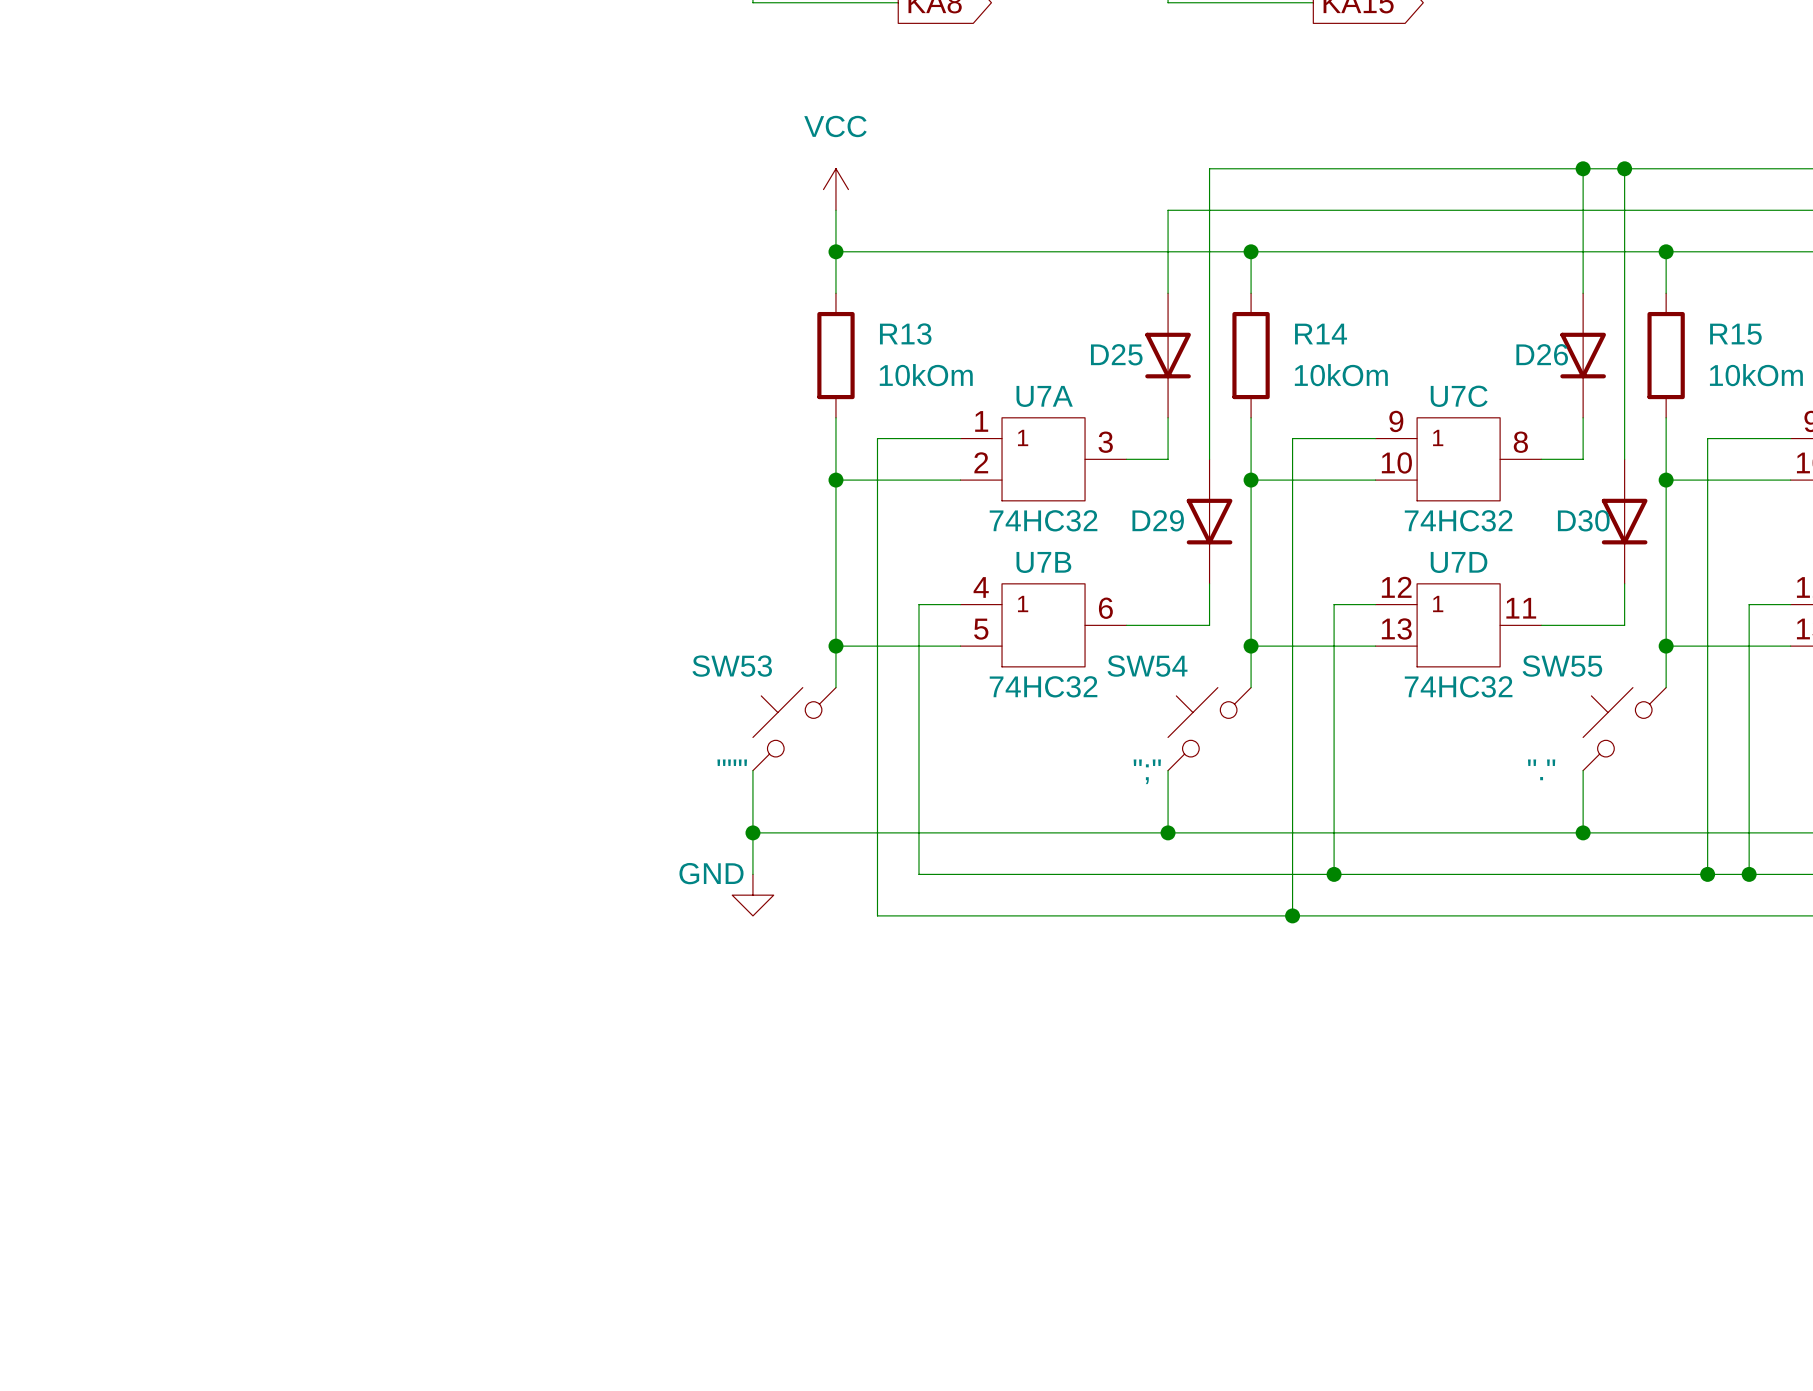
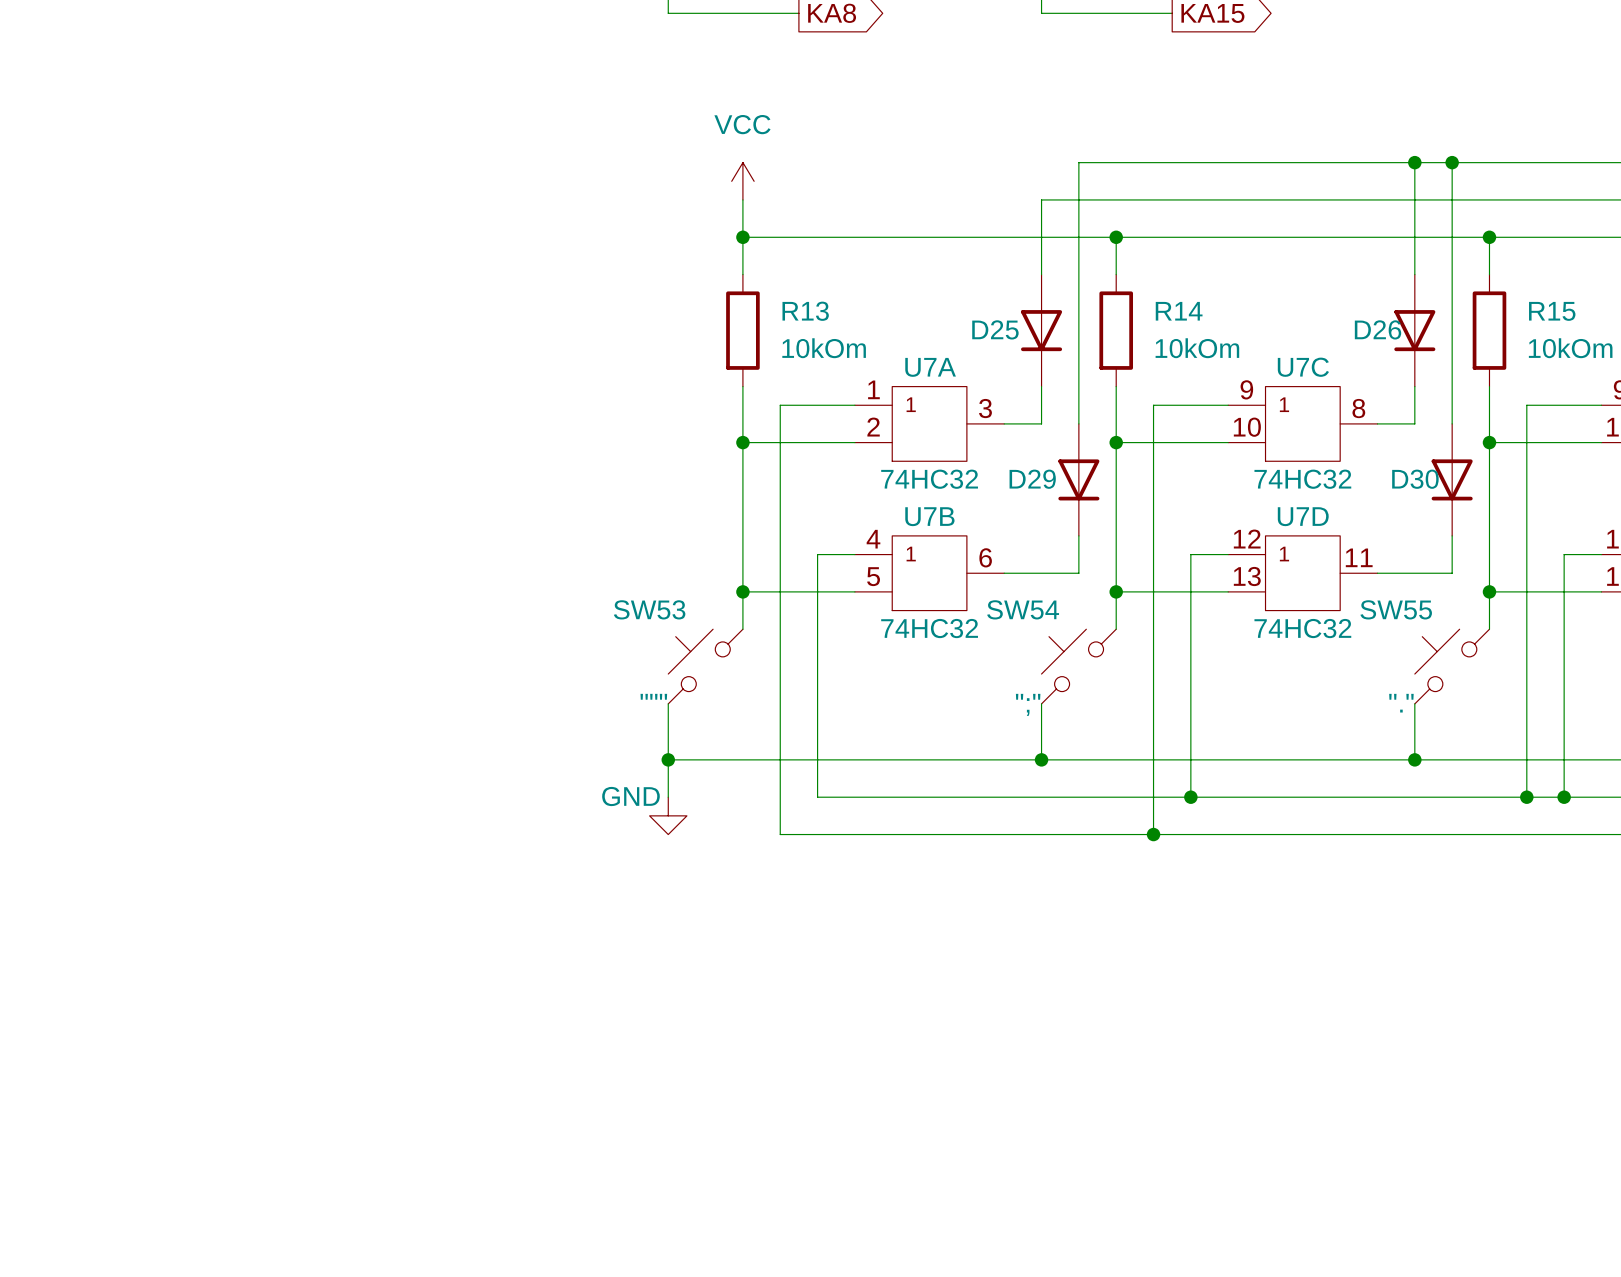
SW53 value: """ (732, 762) -> none
SW53 text: none -> """ (653, 696)
SW55 value: "." (1541, 769) -> none
SW55 text: none -> "." (1401, 703)
SW54 value: ";" (1147, 771) -> none
SW54 text: none -> ";" (1028, 704)

